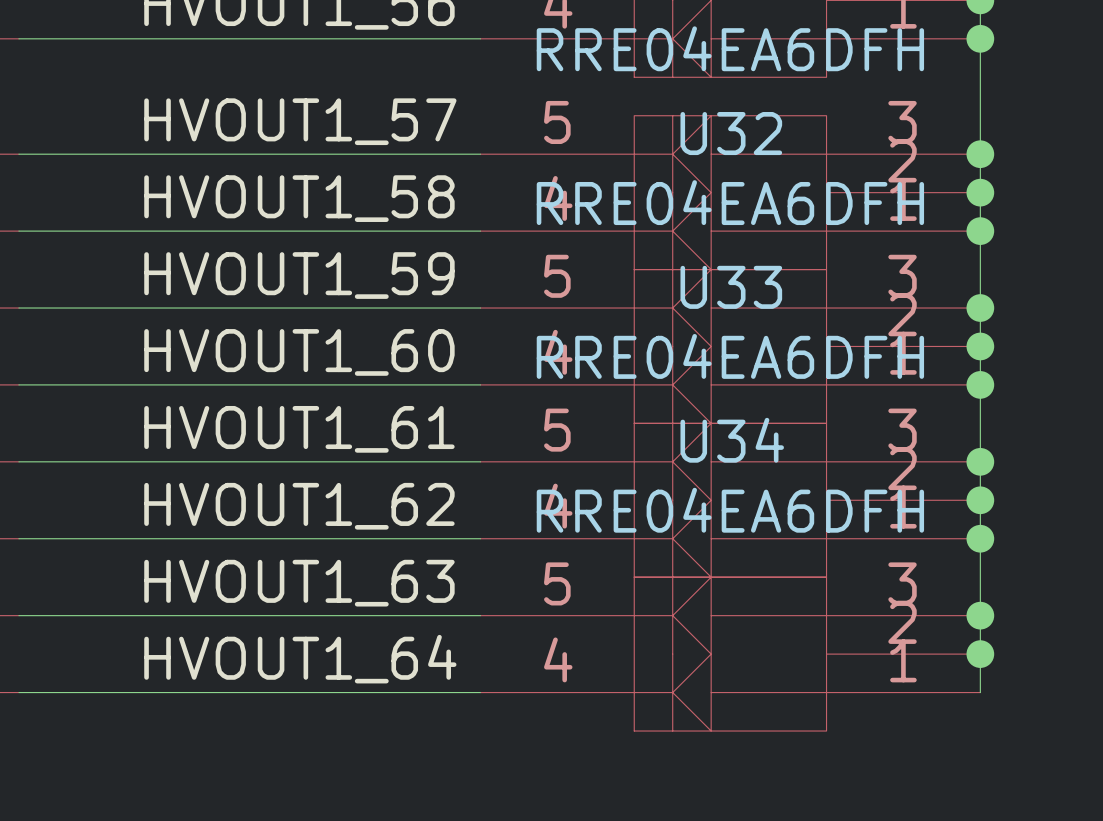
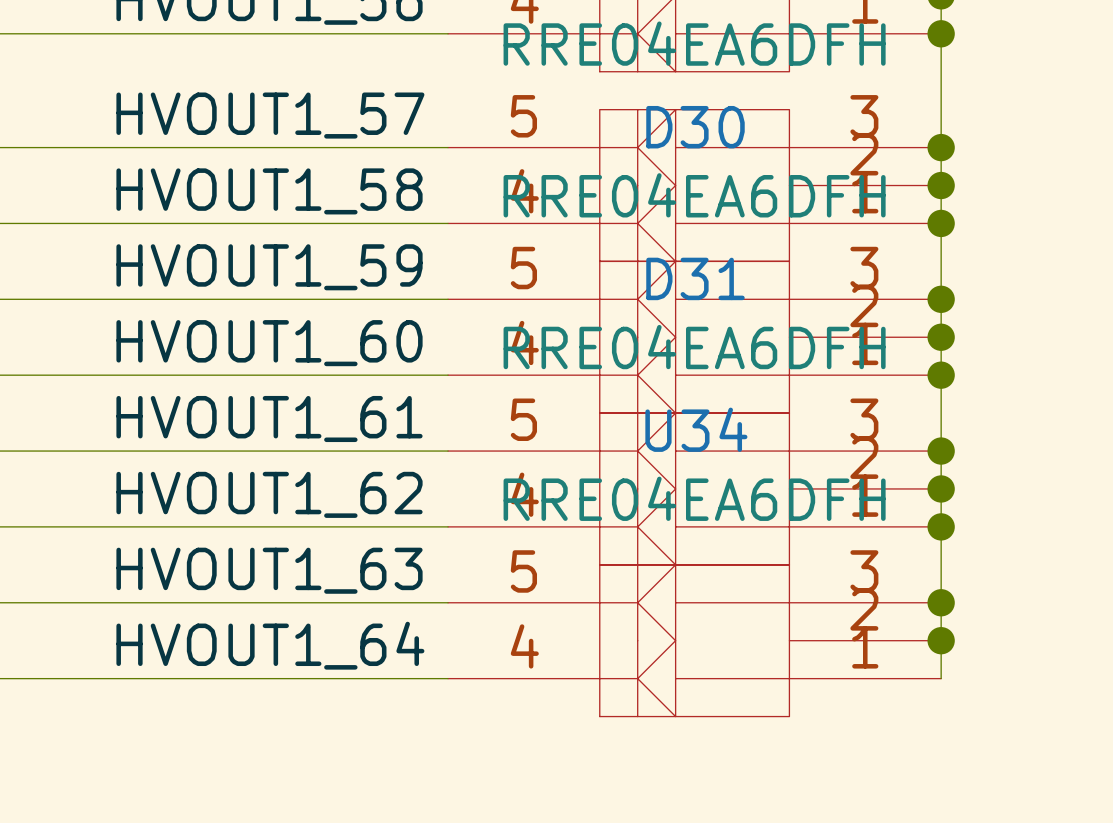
U32 name: U32 (731, 133) -> D30 (695, 127)
U33 name: U33 (731, 287) -> D31 (695, 278)

